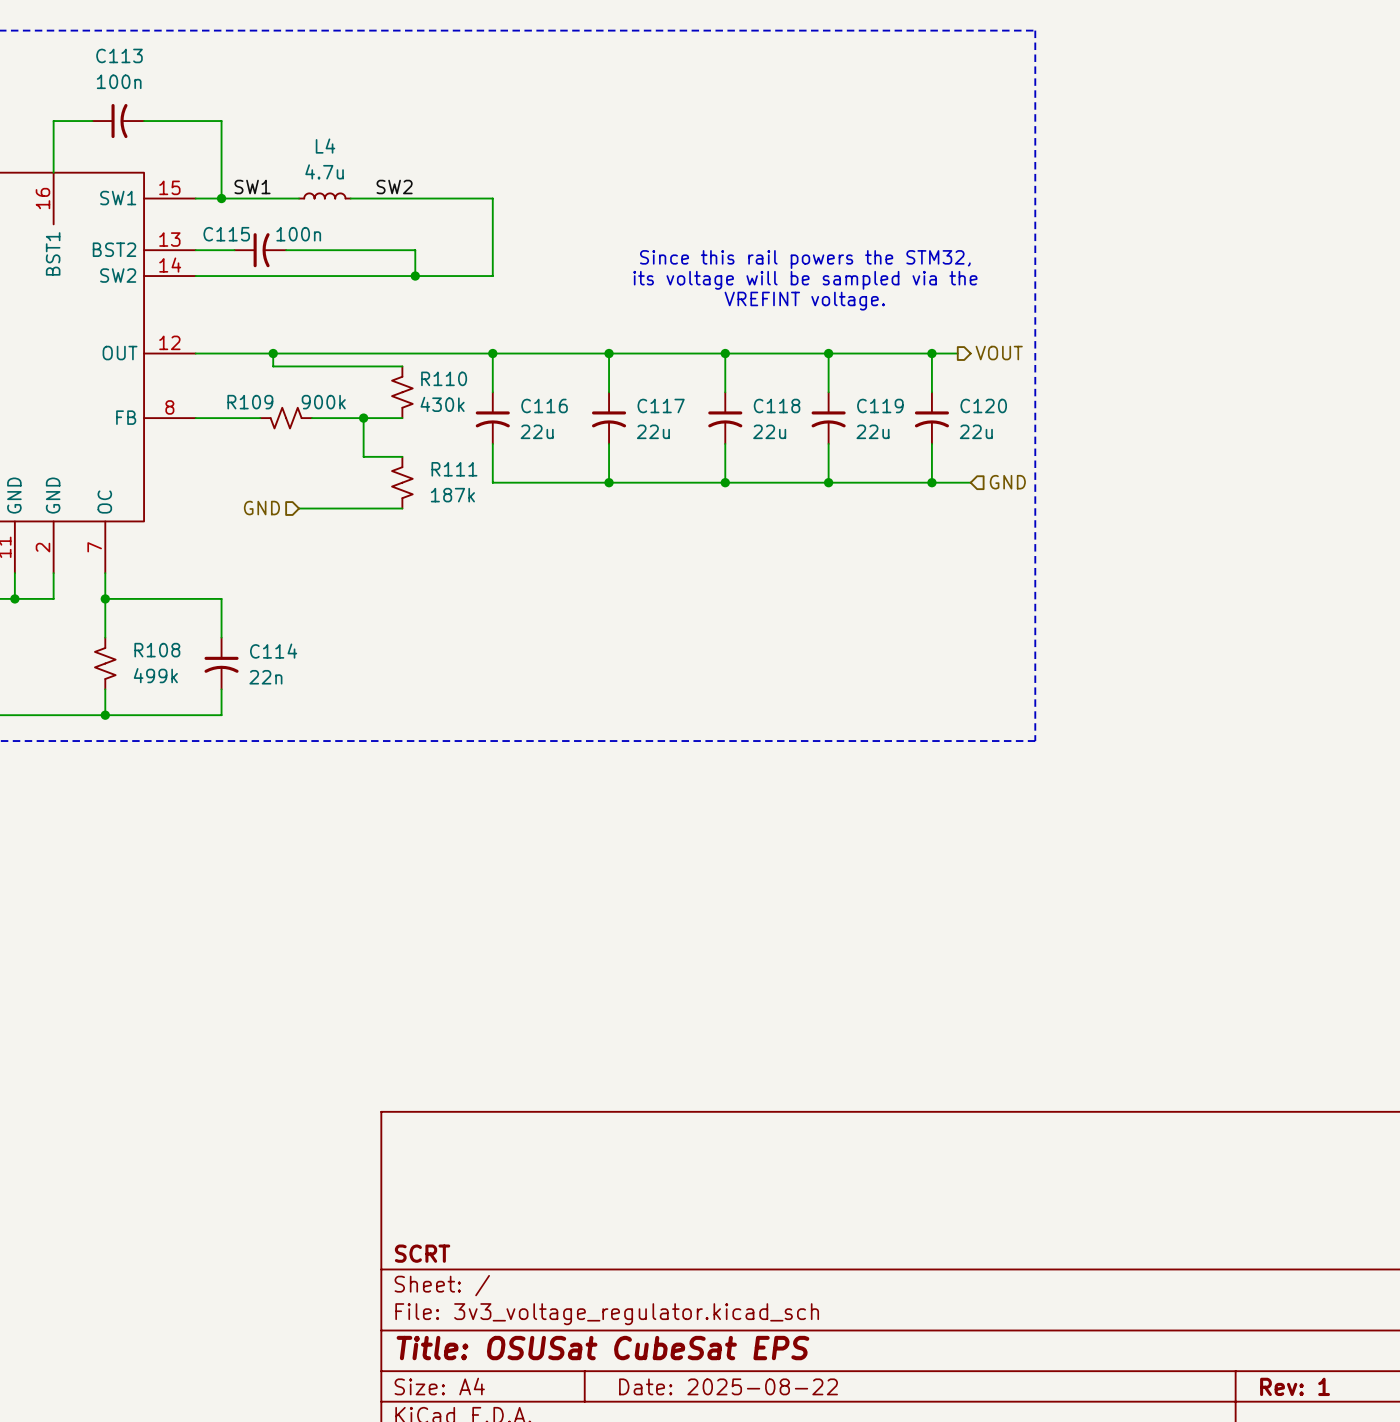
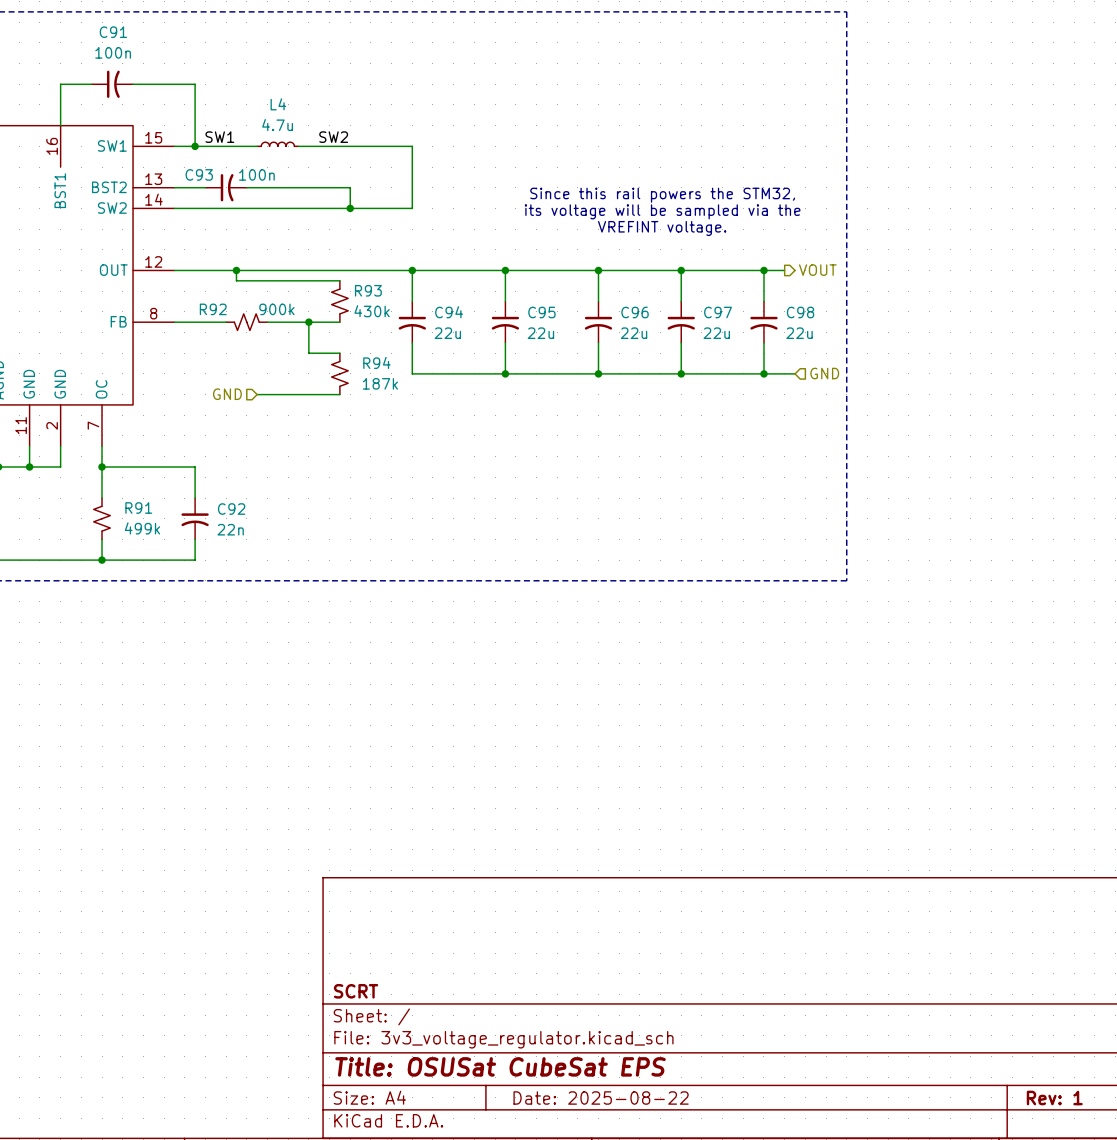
C113 name: C113 (119, 55) -> C91 (113, 32)
C115 name: C115 (226, 234) -> C93 (199, 174)
R110 name: R110 (444, 378) -> R93 (368, 290)
R109 name: R109 (250, 402) -> R92 (213, 309)
C116 name: C116 (544, 406) -> C94 (449, 312)
C117 name: C117 (661, 406) -> C95 (541, 312)
C118 name: C118 (777, 406) -> C96 (635, 312)
C119 name: C119 (880, 406) -> C97 (718, 312)
C120 name: C120 (983, 406) -> C98 (800, 312)
R111 name: R111 (454, 469) -> R94 (376, 362)
R108 name: R108 (157, 650) -> R91 (138, 507)
C114 name: C114 (273, 651) -> C92 (231, 509)

